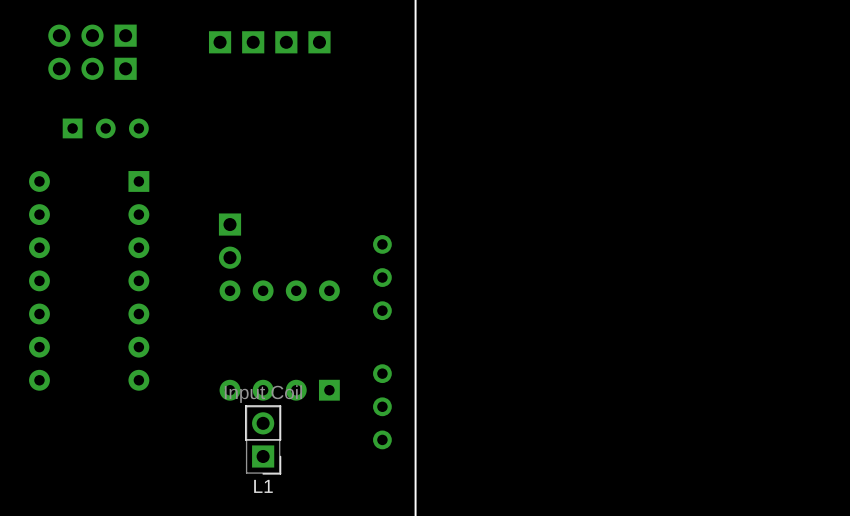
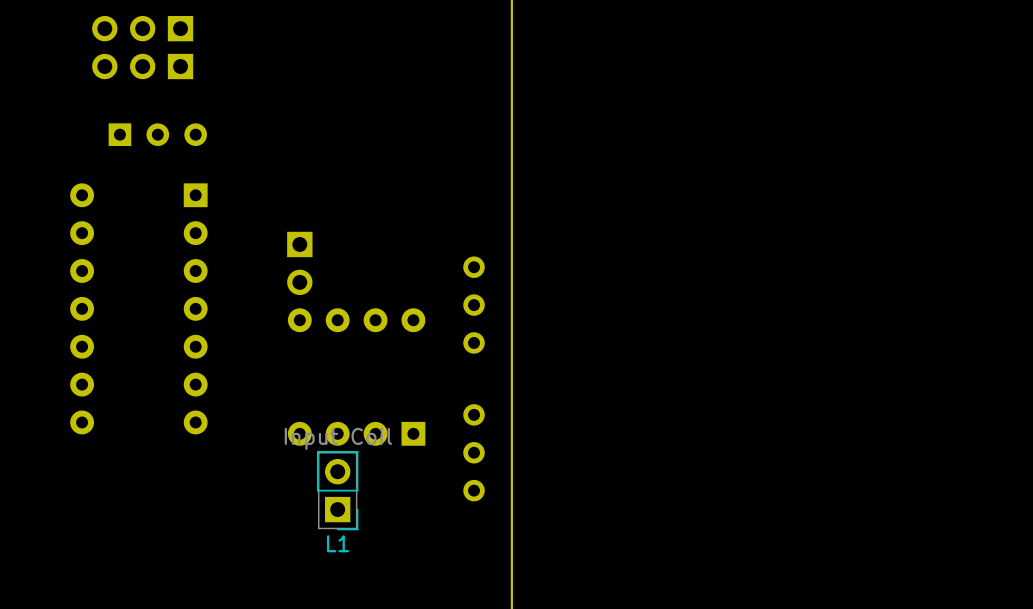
part: (220, 42) -> none
part: (253, 42) -> none
part: (286, 42) -> none
part: (319, 42) -> none

